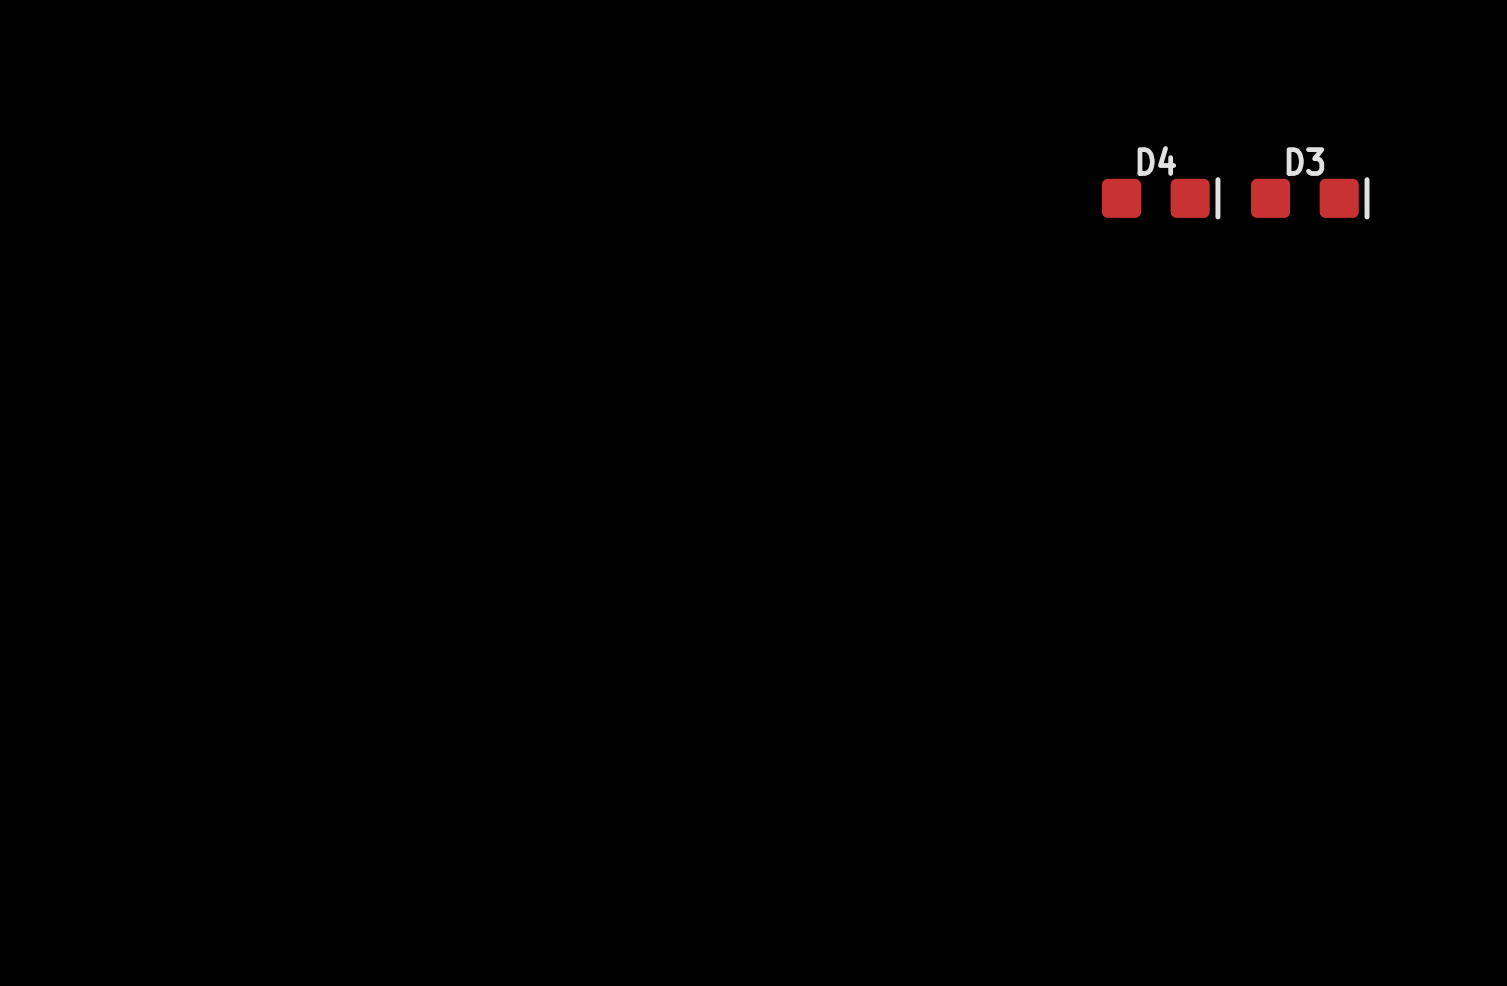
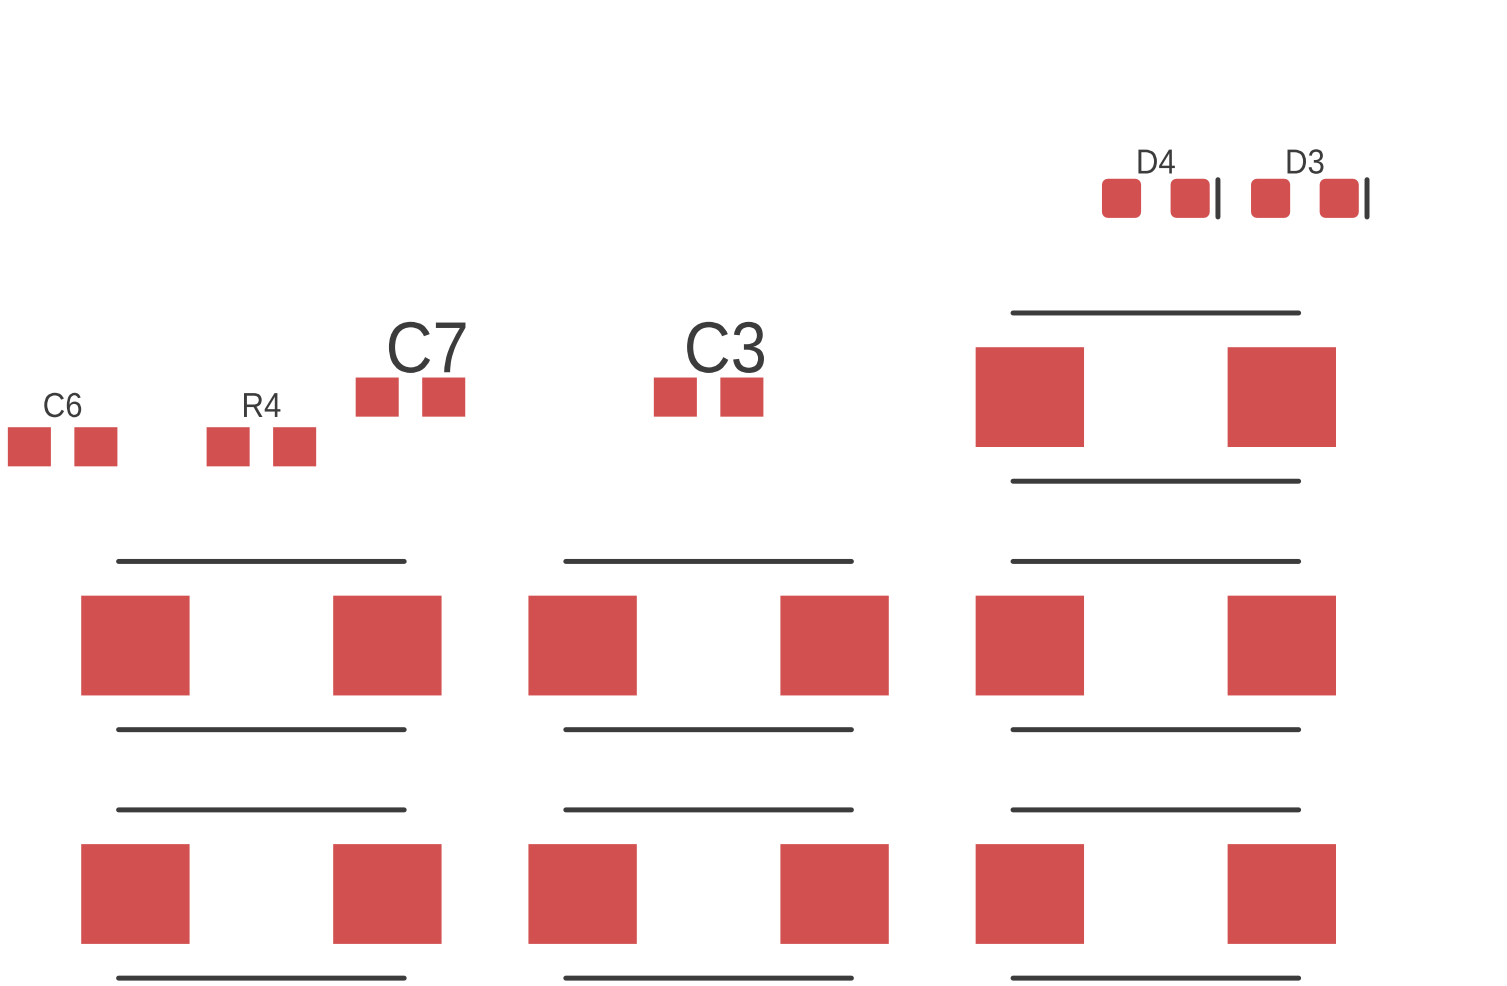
C7: none -> (410, 397)
C3: none -> (708, 397)
part: none -> (1155, 397)
C6: none -> (62, 446)
R4: none -> (261, 446)
part: none -> (261, 645)
part: none -> (708, 645)
part: none -> (1155, 645)
part: none -> (261, 894)
part: none -> (708, 894)
part: none -> (1155, 894)

